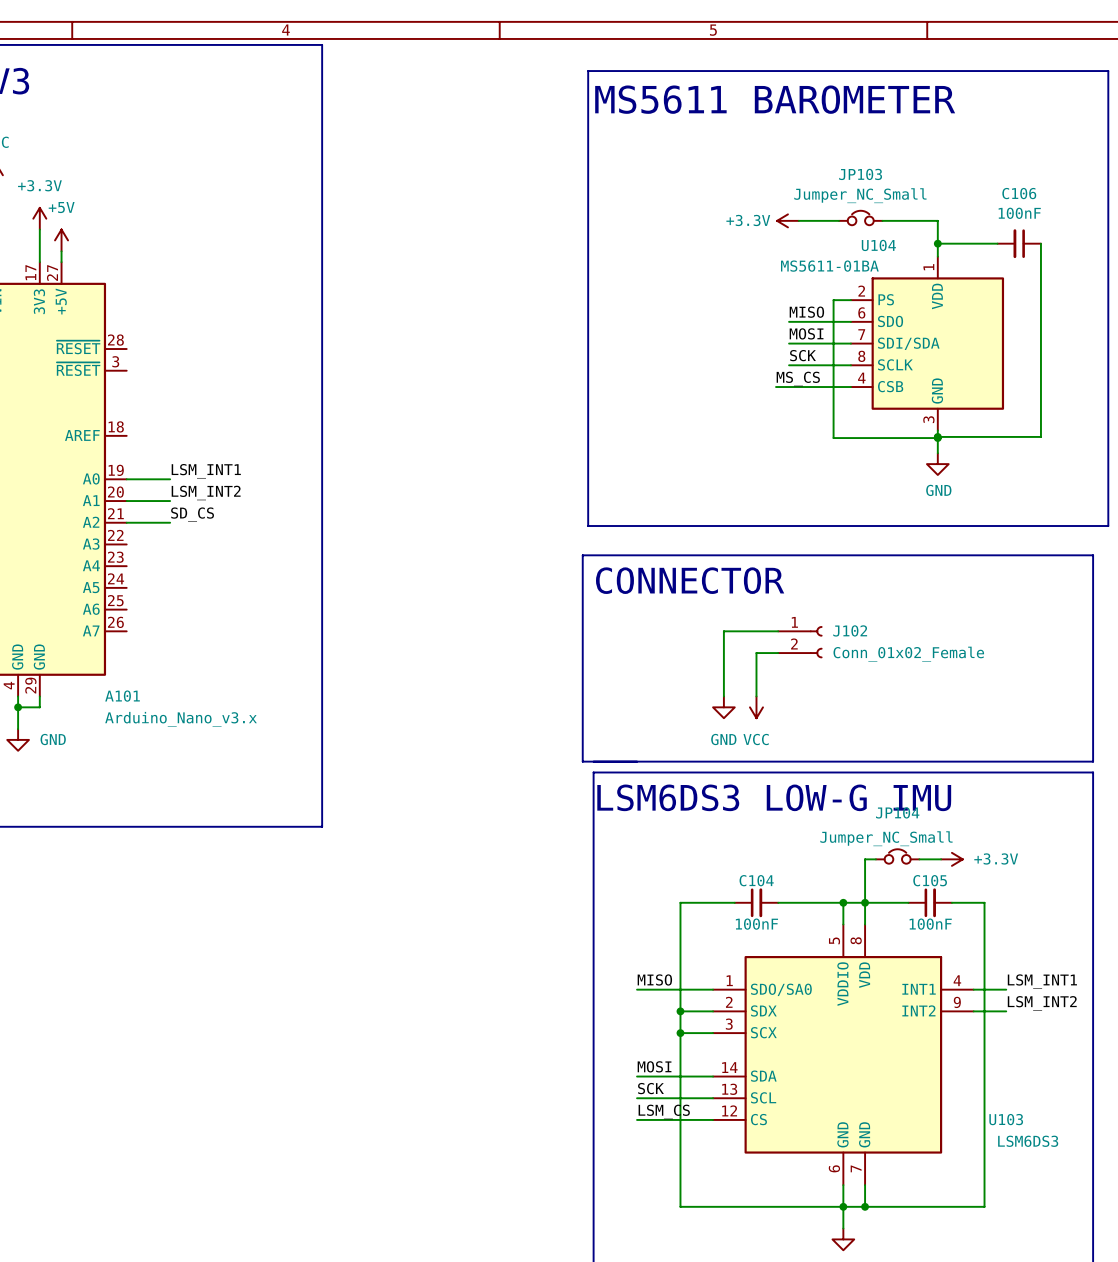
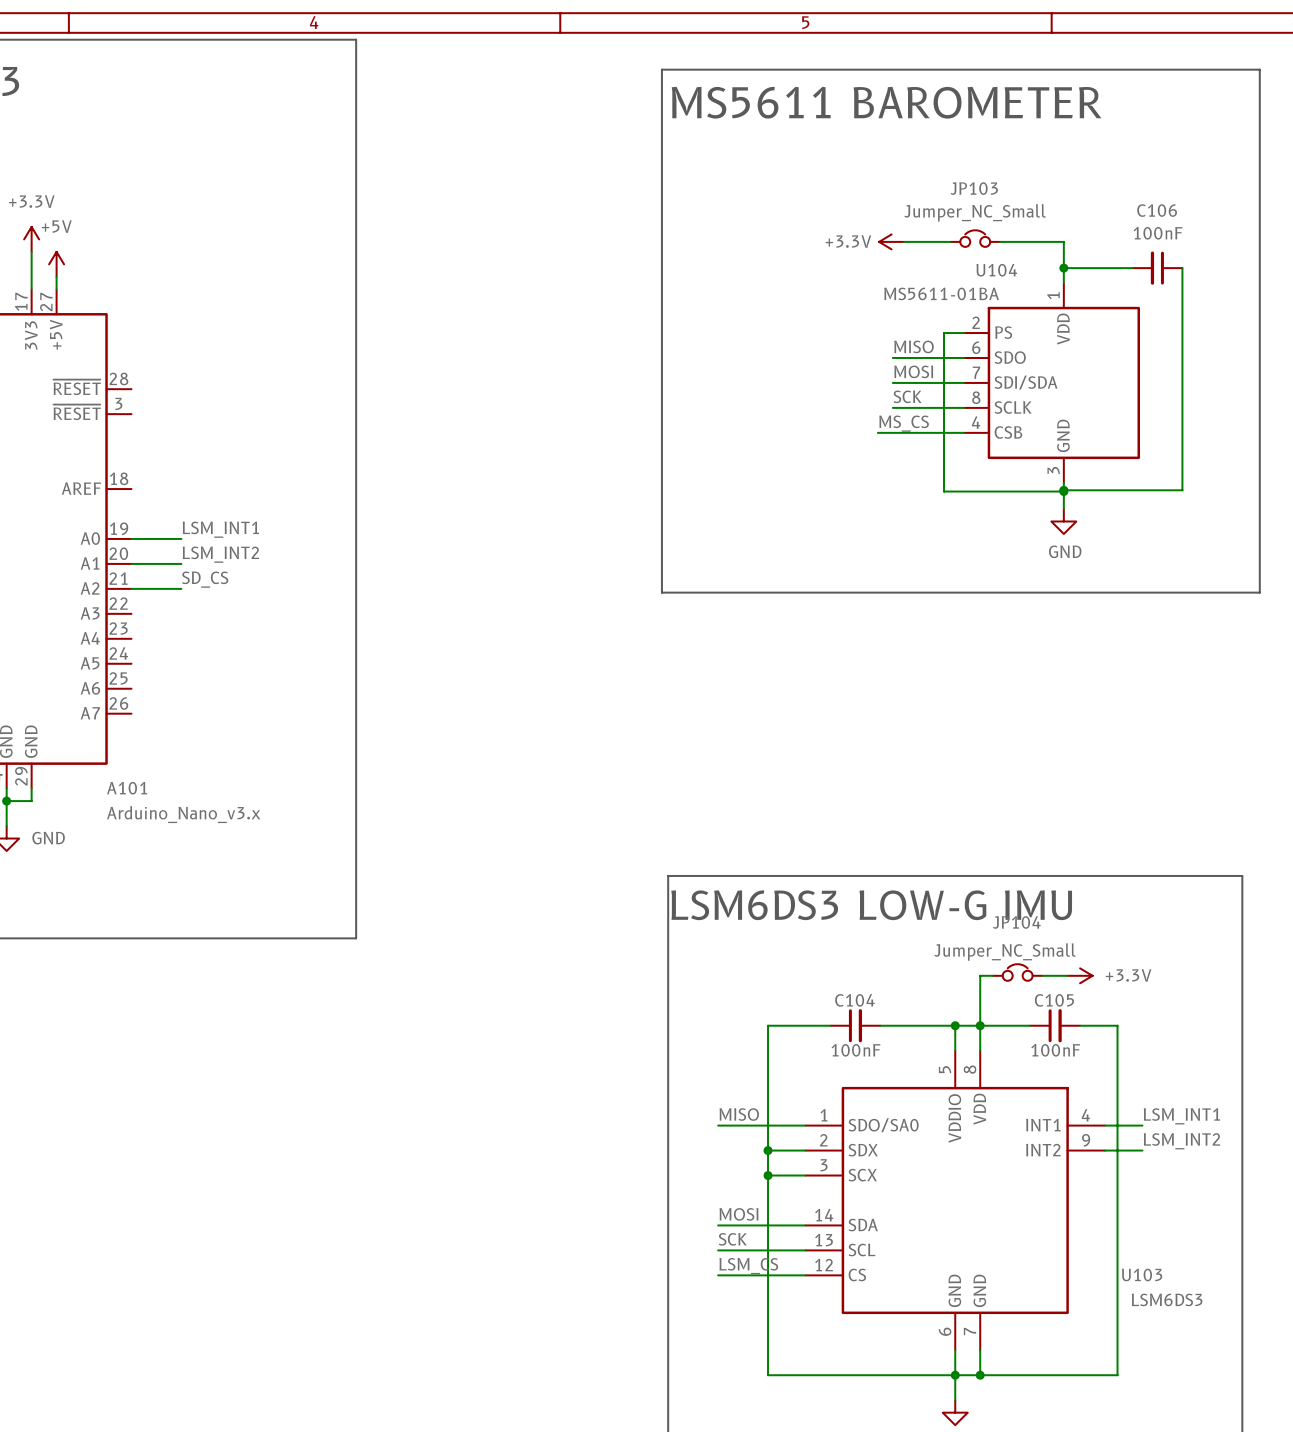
line: (582, 555) (1093, 555) (1093, 761) (582, 761) (582, 555) -> none
text: CONNECTOR (690, 580) -> none
wire: (778, 631) (723, 631) (723, 696) -> none
J102: Conn_01x02_Female (800, 642) -> none
wire: (778, 653) (756, 653) (756, 696) -> none
power symbol: GND (723, 707) -> none
power symbol: VCC (756, 707) -> none

